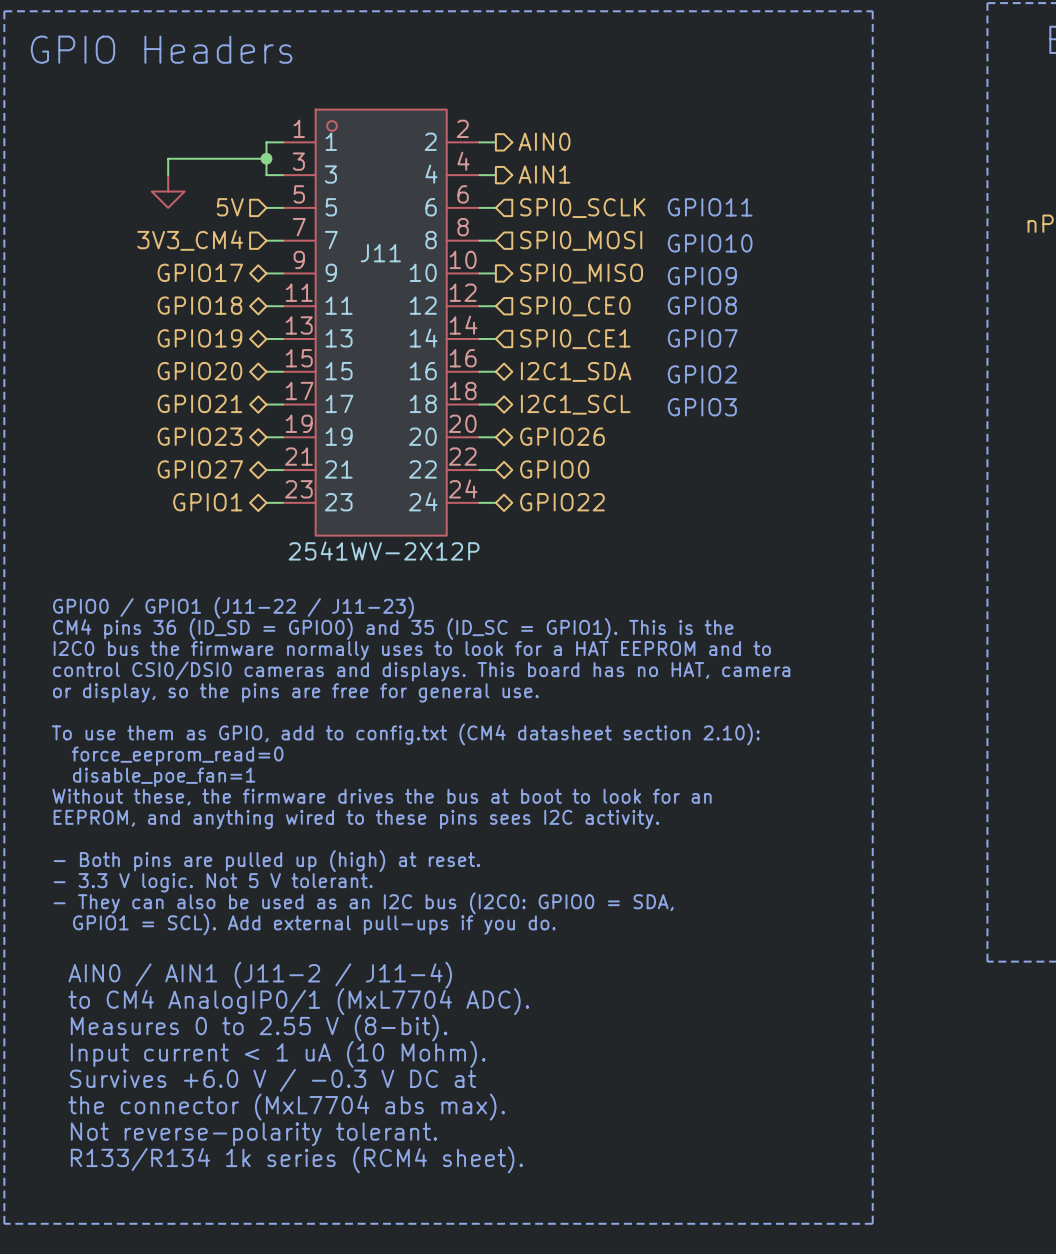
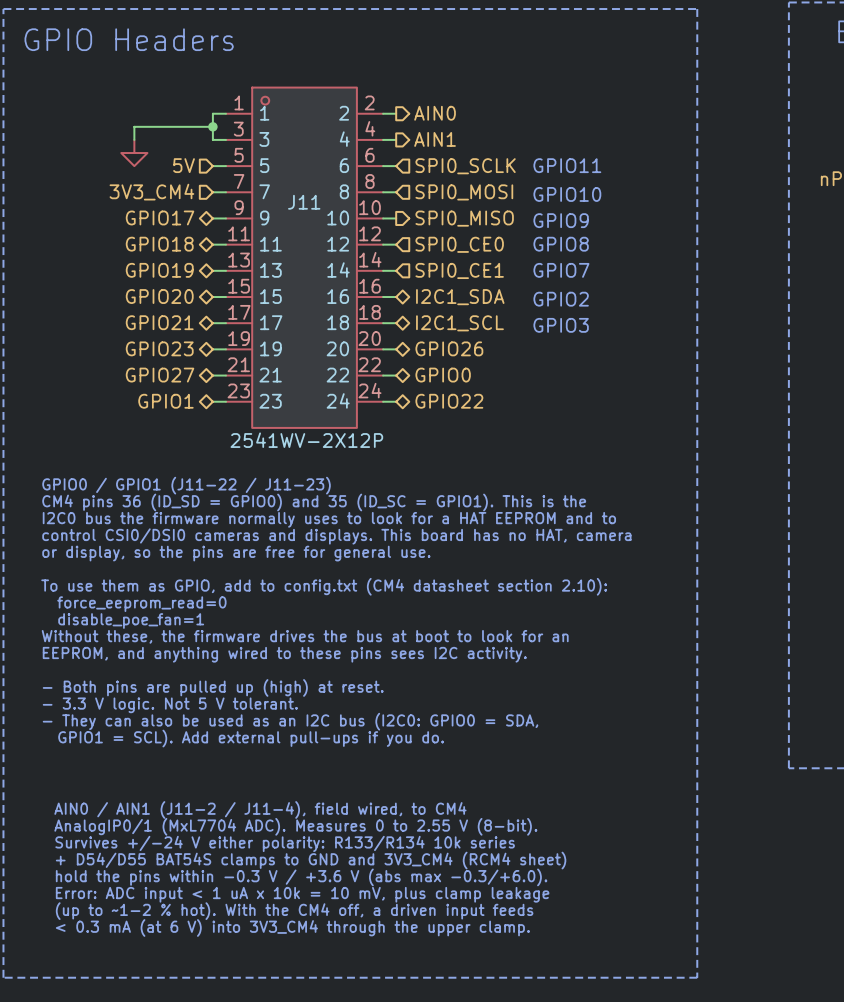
text: AIN0 / AIN1 (J11-2 / J11-4) (260, 975) -> none
text: to CM4 AnalogIP0/1 (MxL7704 ADC). (298, 1001) -> none
text: none -> AIN0 / AIN1 (J11-2 / J11-4), field wired, to CM4 (260, 809)
text: Measures 0 to 2.55 V (8-bit). (259, 1027) -> AnalogIP0/1 (MxL7704 ADC). Measures 0 to 2.55 V (8-bit). (295, 826)
text: Input current < 1 uA (10 Mohm). (278, 1054) -> Survives +/-24 V either polarity: R133/R134 10k series (285, 843)
text: Survives +6.0 V / -0.3 V DC at (273, 1080) -> + D54/D55 BAT54S clamps to GND and 3V3_CM4 (RCM4 sheet) (311, 860)
text: none -> hold the pins within -0.3 V / +3.6 V (abs max -0.3/+6.0). (301, 877)
text: the connector (MxL7704 abs max). (286, 1107) -> none
text: none -> Error: ADC input < 1 uA x 10k = 10 mV, plus clamp leakage (302, 894)
text: Not reverse-polarity tolerant. (253, 1134) -> (up to ~1-2 % hot). With the CM4 off, a driven input feeds (294, 911)
text: R133/R134 1k series (RCM4 sheet). (296, 1159) -> < 0.3 mA (at 6 V) into 3V3_CM4 through the upper clamp. (292, 927)

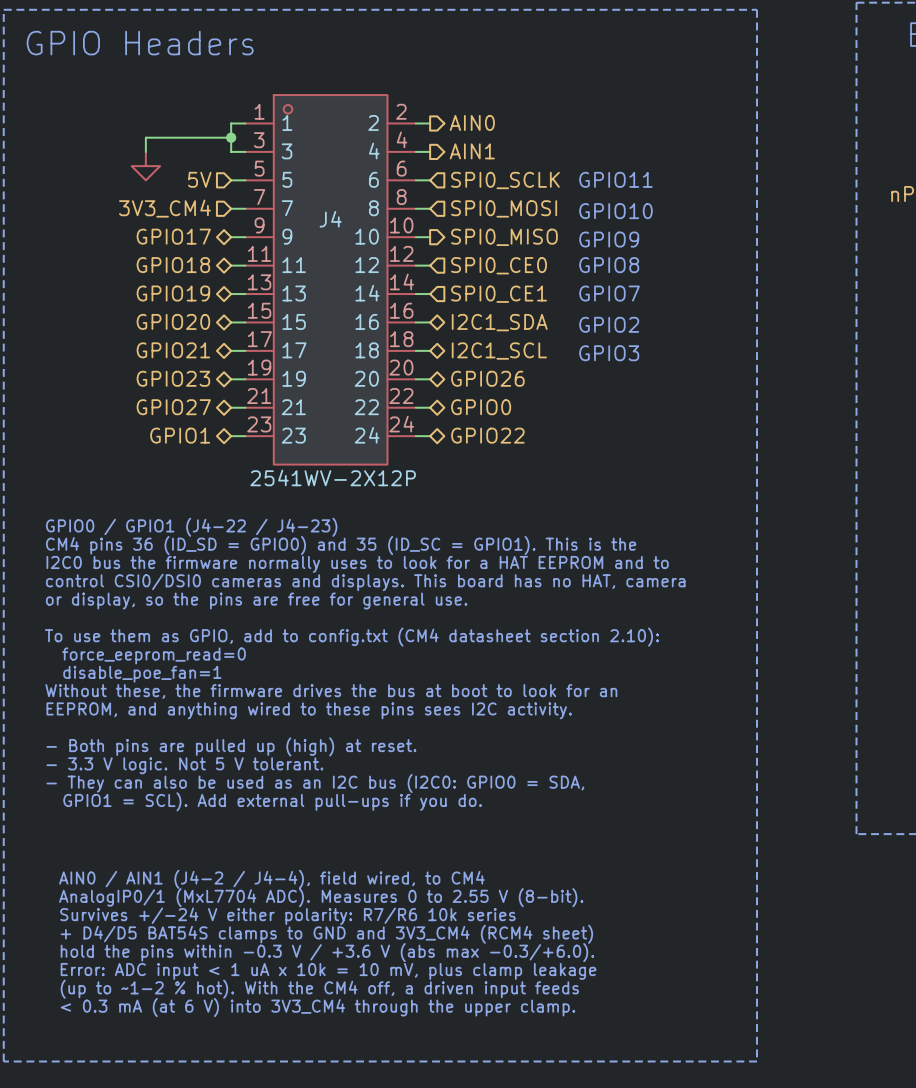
J11 name: J11 (304, 202) -> J4 (330, 219)
text: GPIO0 / GPIO1 (J11-22 / J11-23) (186, 485) -> GPIO0 / GPIO1 (J4-22 / J4-23) (191, 527)
text: AIN0 / AIN1 (J11-2 / J11-4), field wired, to CM4 (260, 809) -> AIN0 / AIN1 (J4-2 / J4-4), field wired, to CM4 (271, 879)
text: Survives +/-24 V either polarity: R133/R134 10k series (285, 843) -> Survives +/-24 V either polarity: R7/R6 10k series (287, 916)
text: + D54/D55 BAT54S clamps to GND and 3V3_CM4 (RCM4 sheet) (311, 860) -> + D4/D5 BAT54S clamps to GND and 3V3_CM4 (RCM4 sheet) (326, 934)

